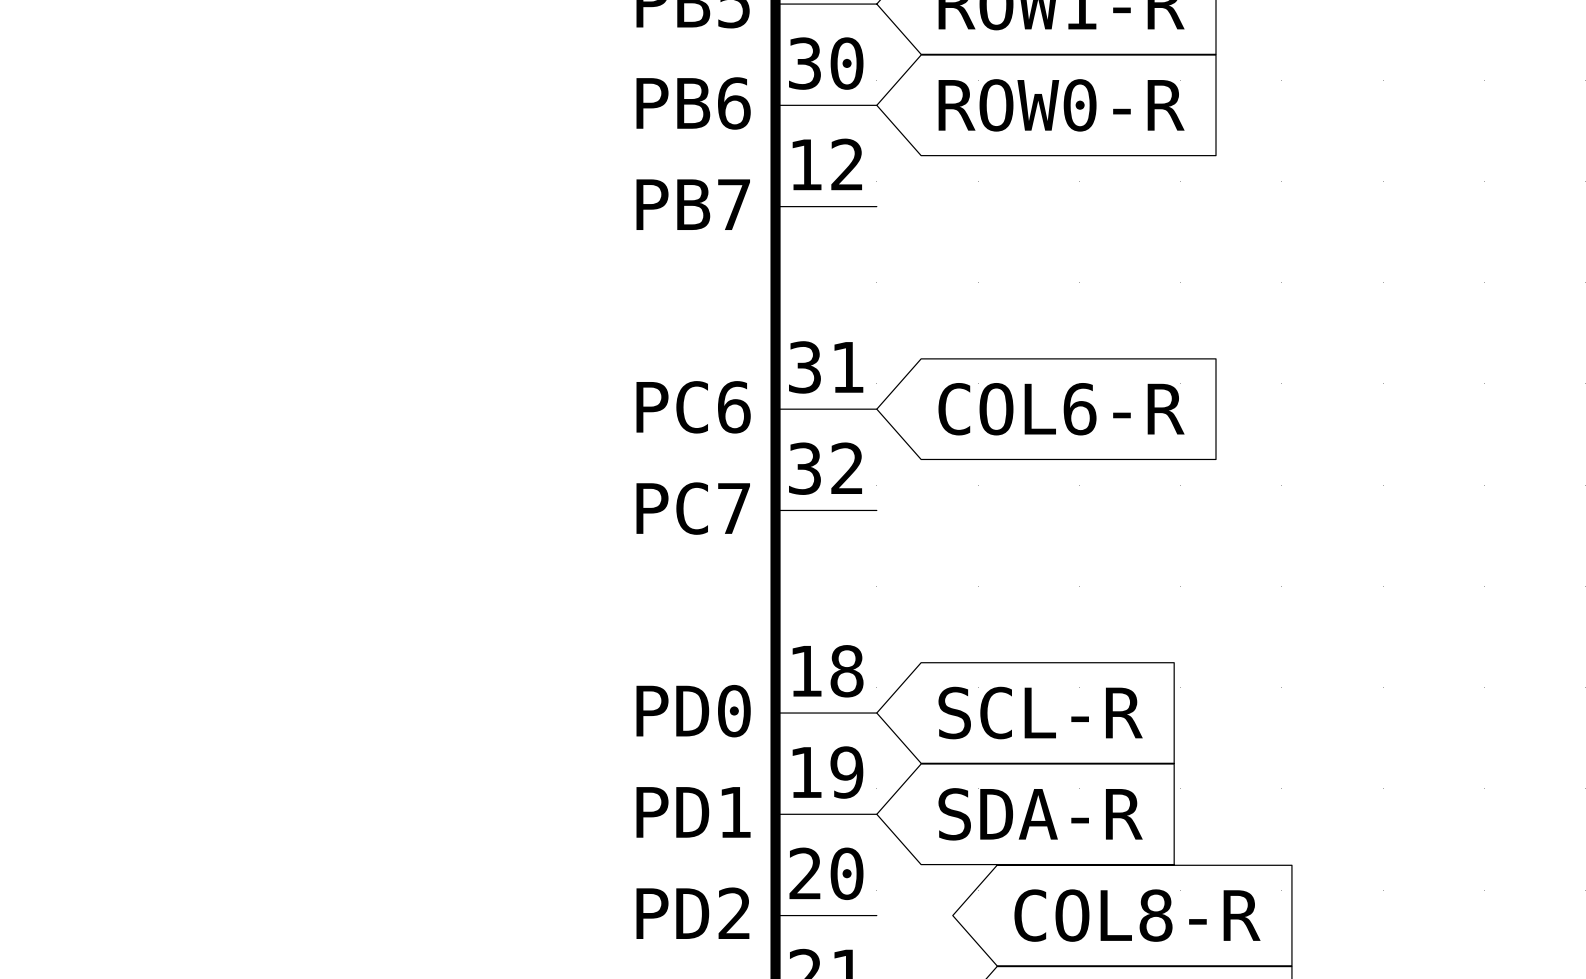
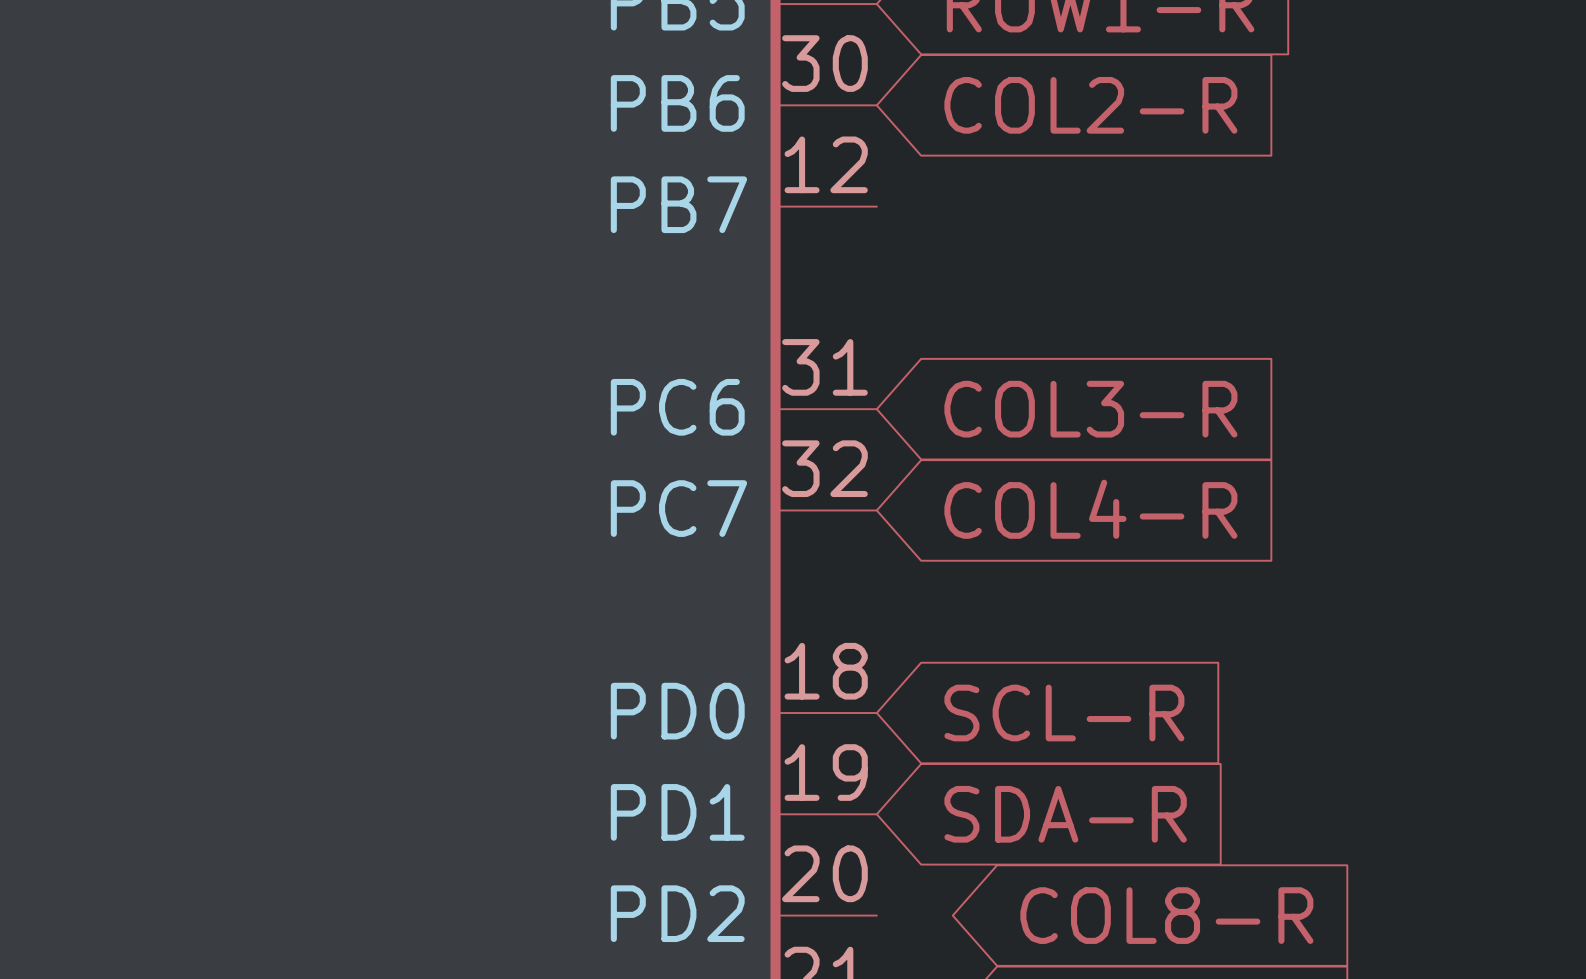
global label: ROW0-R (1061, 105) -> COL2-R (1090, 105)
global label: COL6-R (1061, 409) -> COL3-R (1090, 409)
global label: none -> COL4-R (1090, 509)

